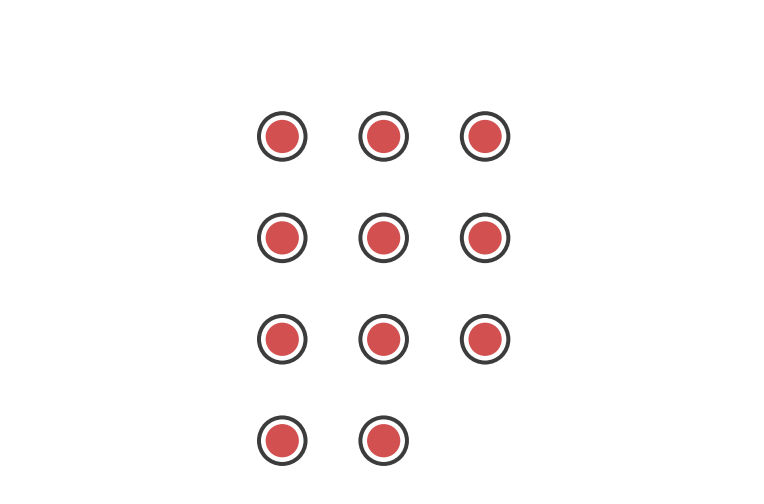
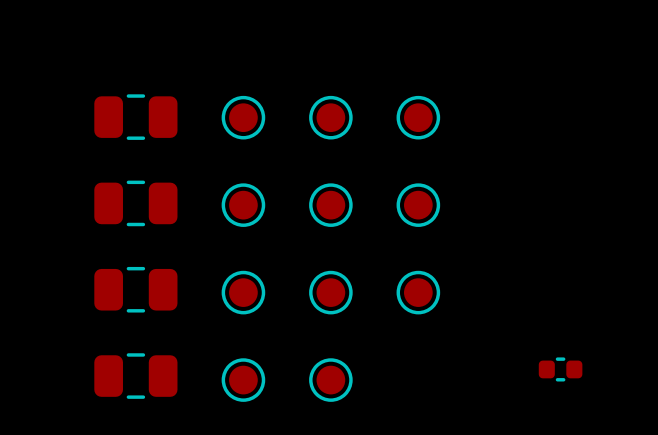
part: none -> (135, 117)
part: none -> (135, 203)
part: none -> (135, 289)
part: none -> (560, 369)
part: none -> (135, 376)

